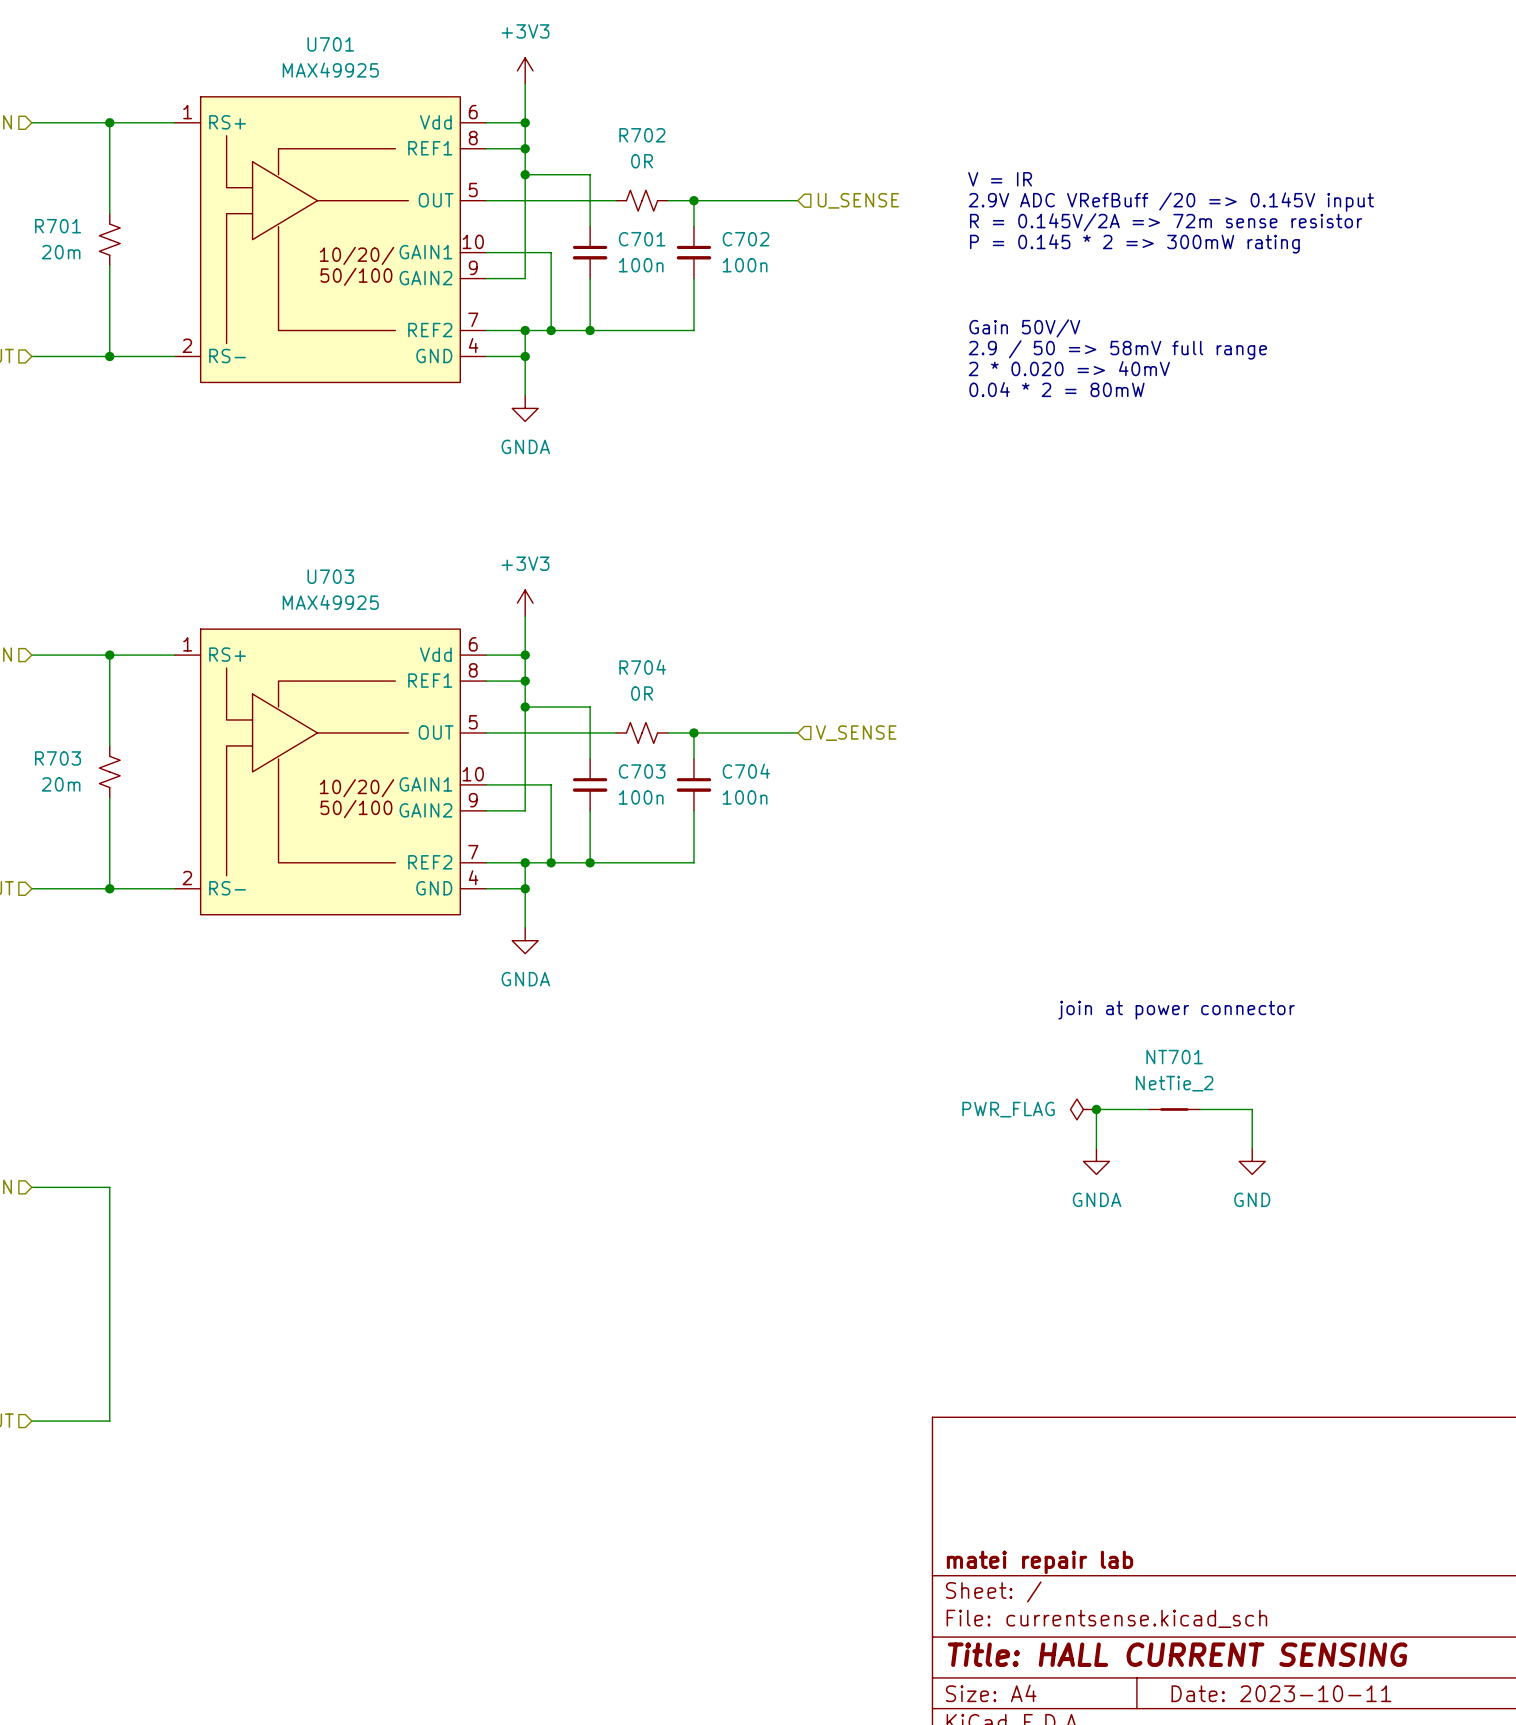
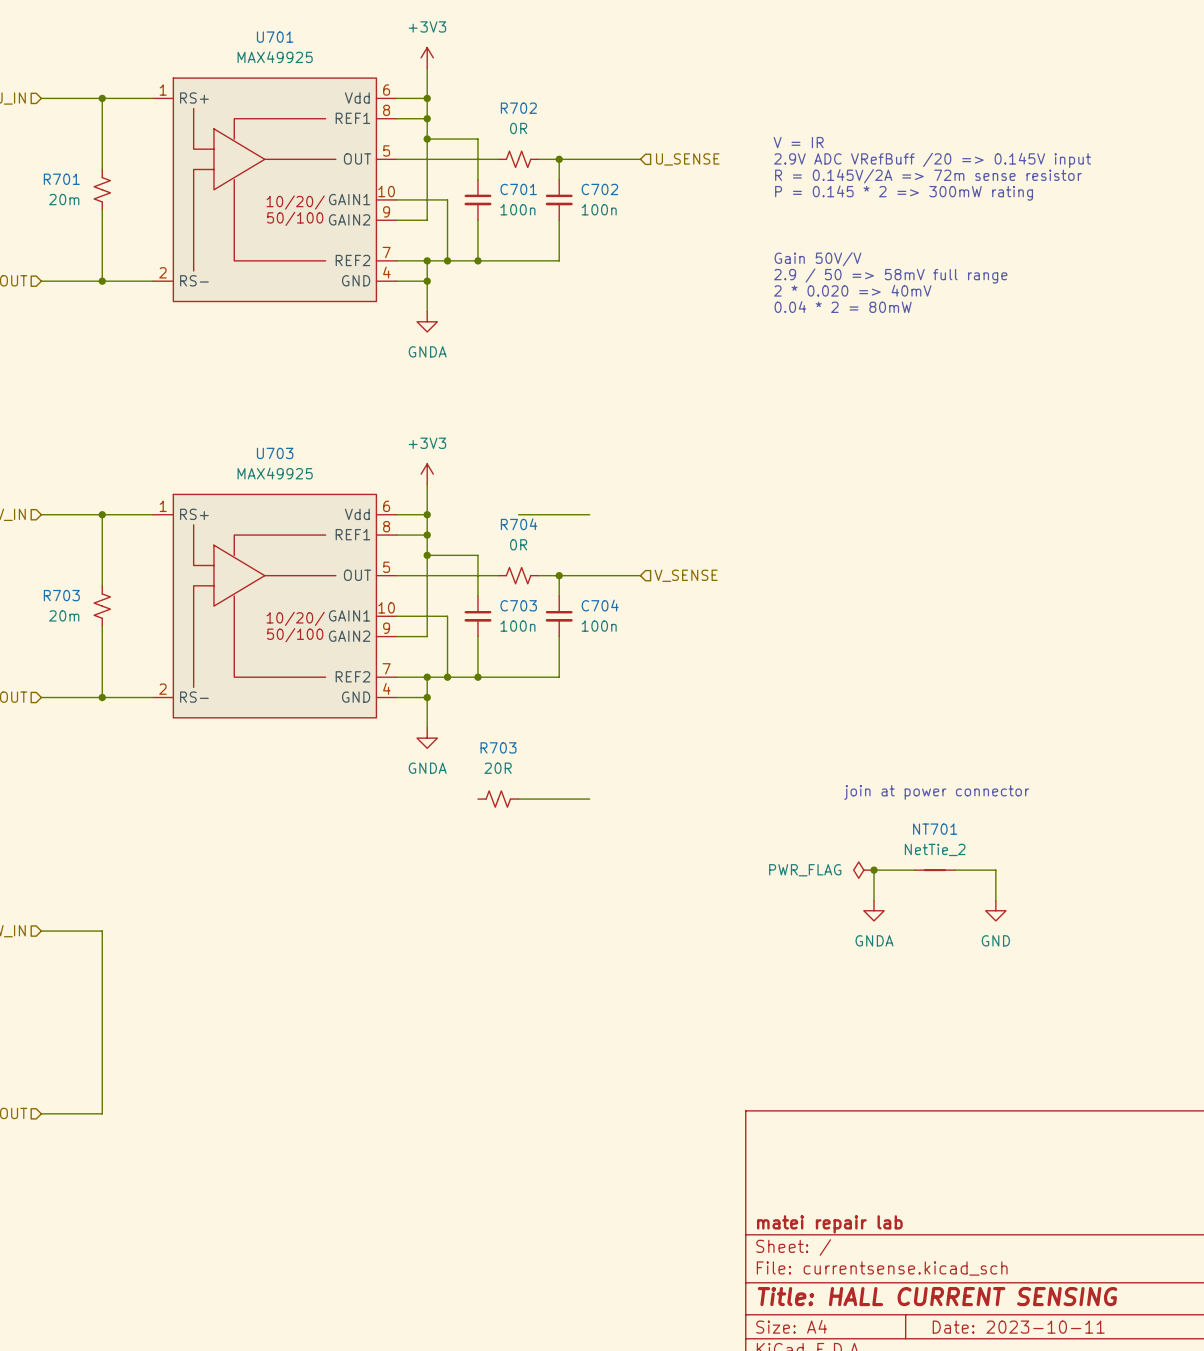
wire: none -> (518, 514) (589, 514)
R703: none -> 20R (498, 799)
wire: none -> (518, 799) (589, 799)

